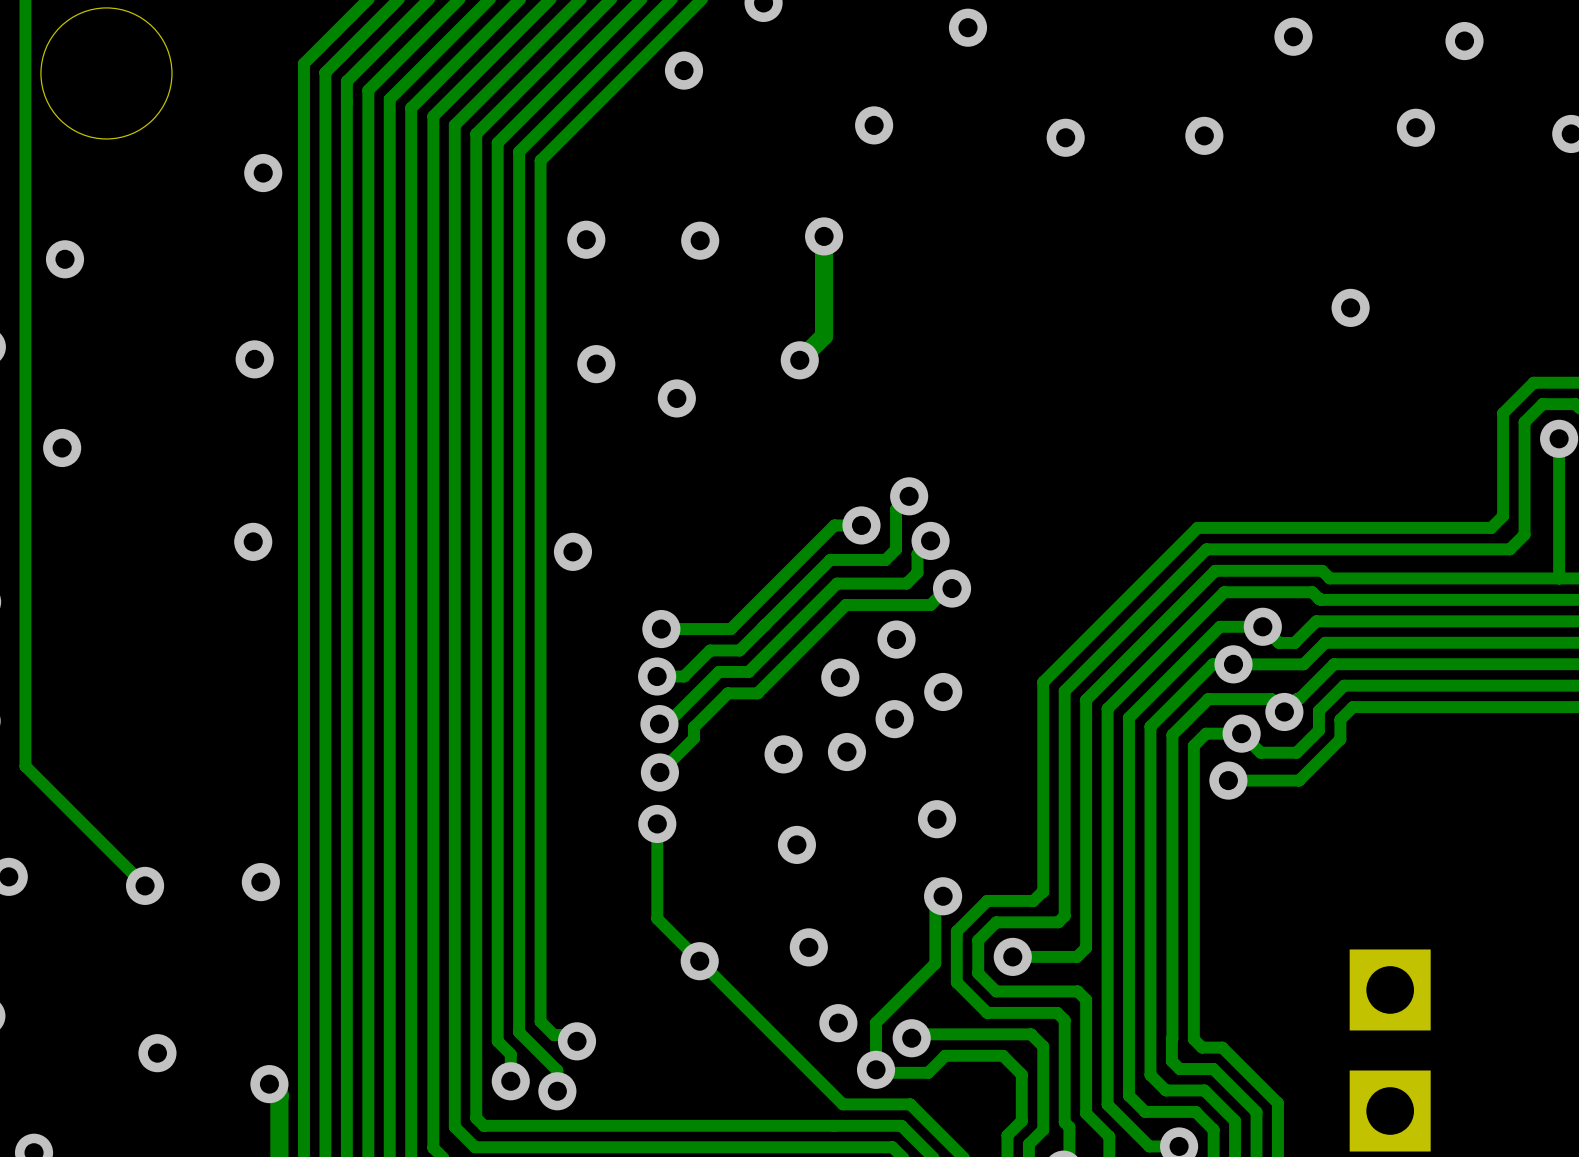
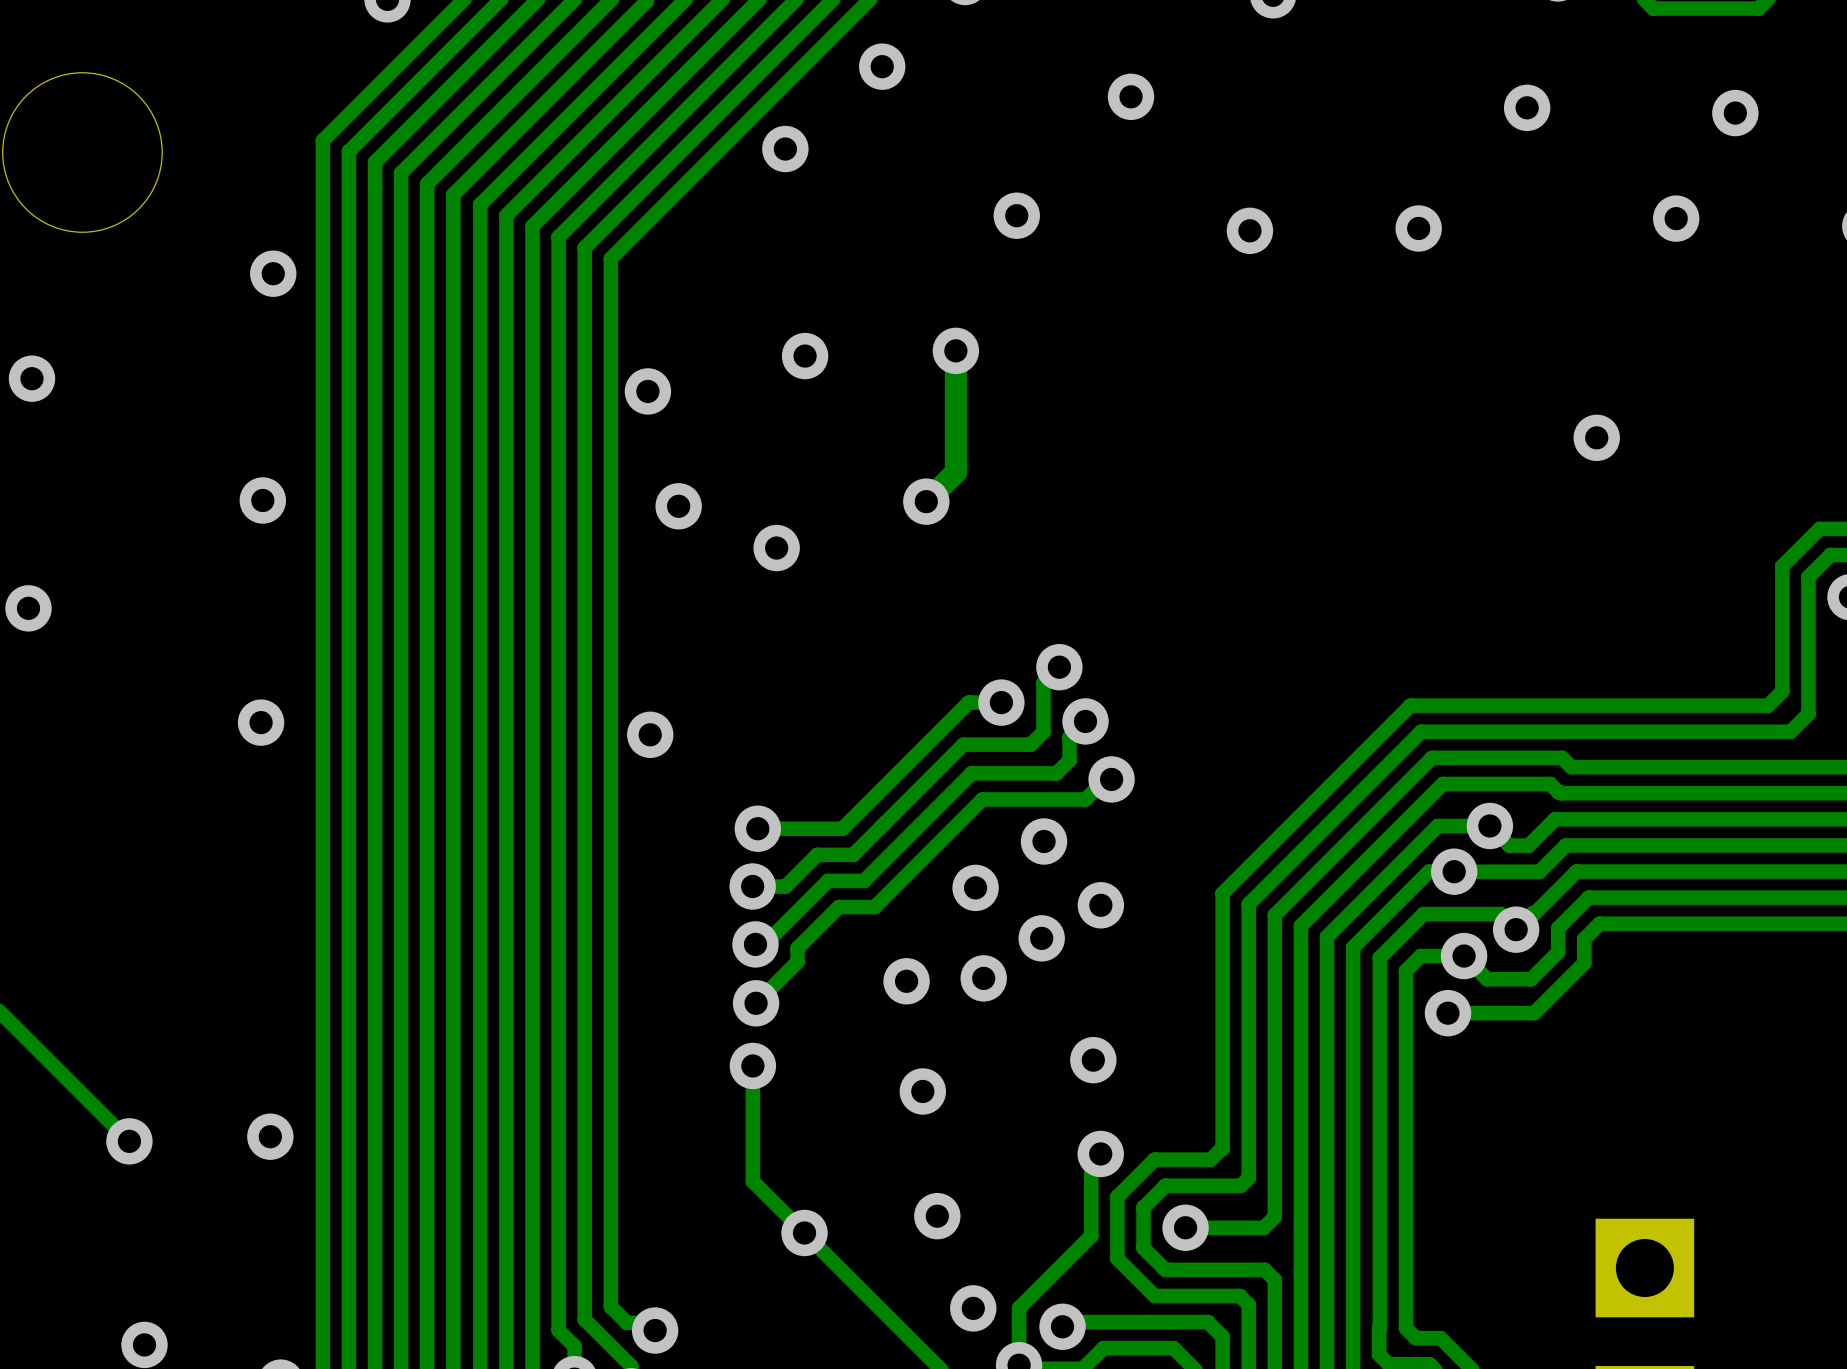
via position: (586, 239) -> (647, 391)

